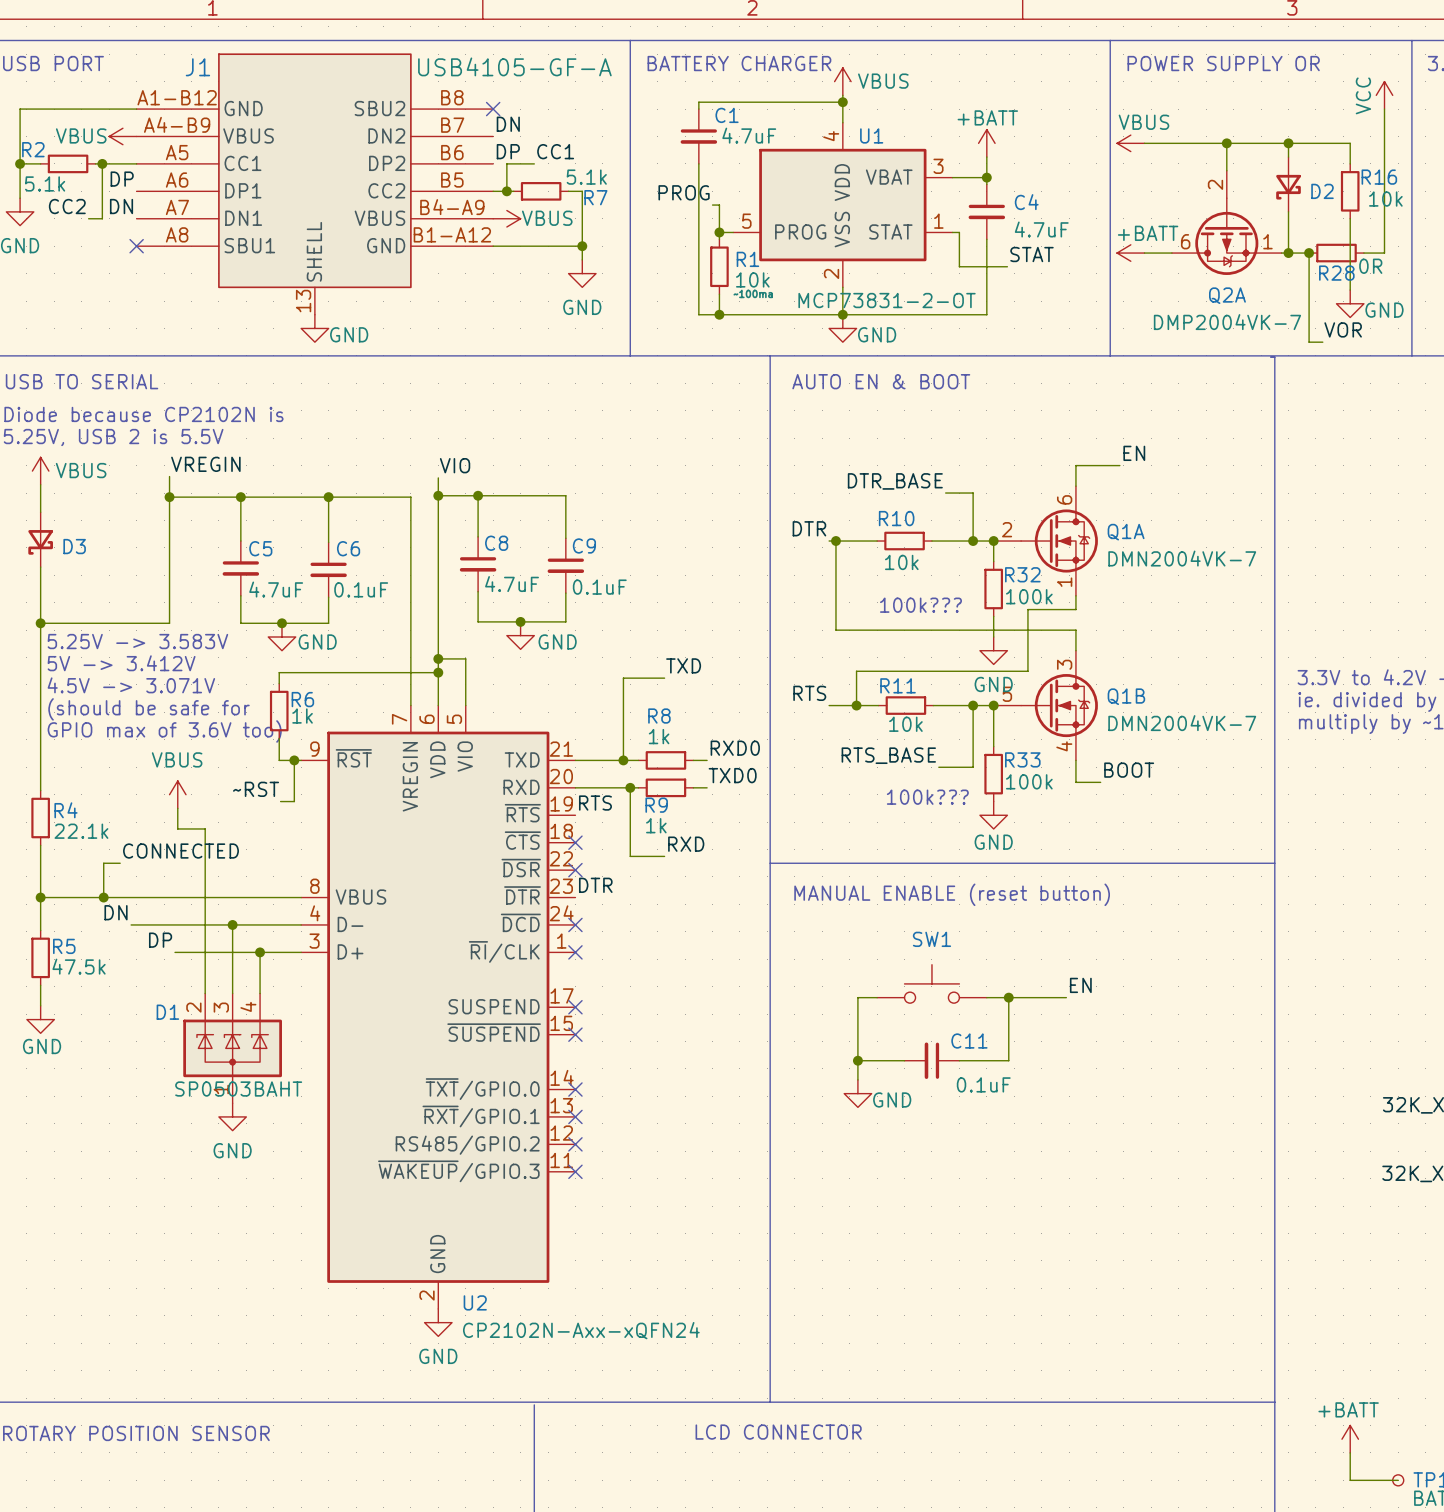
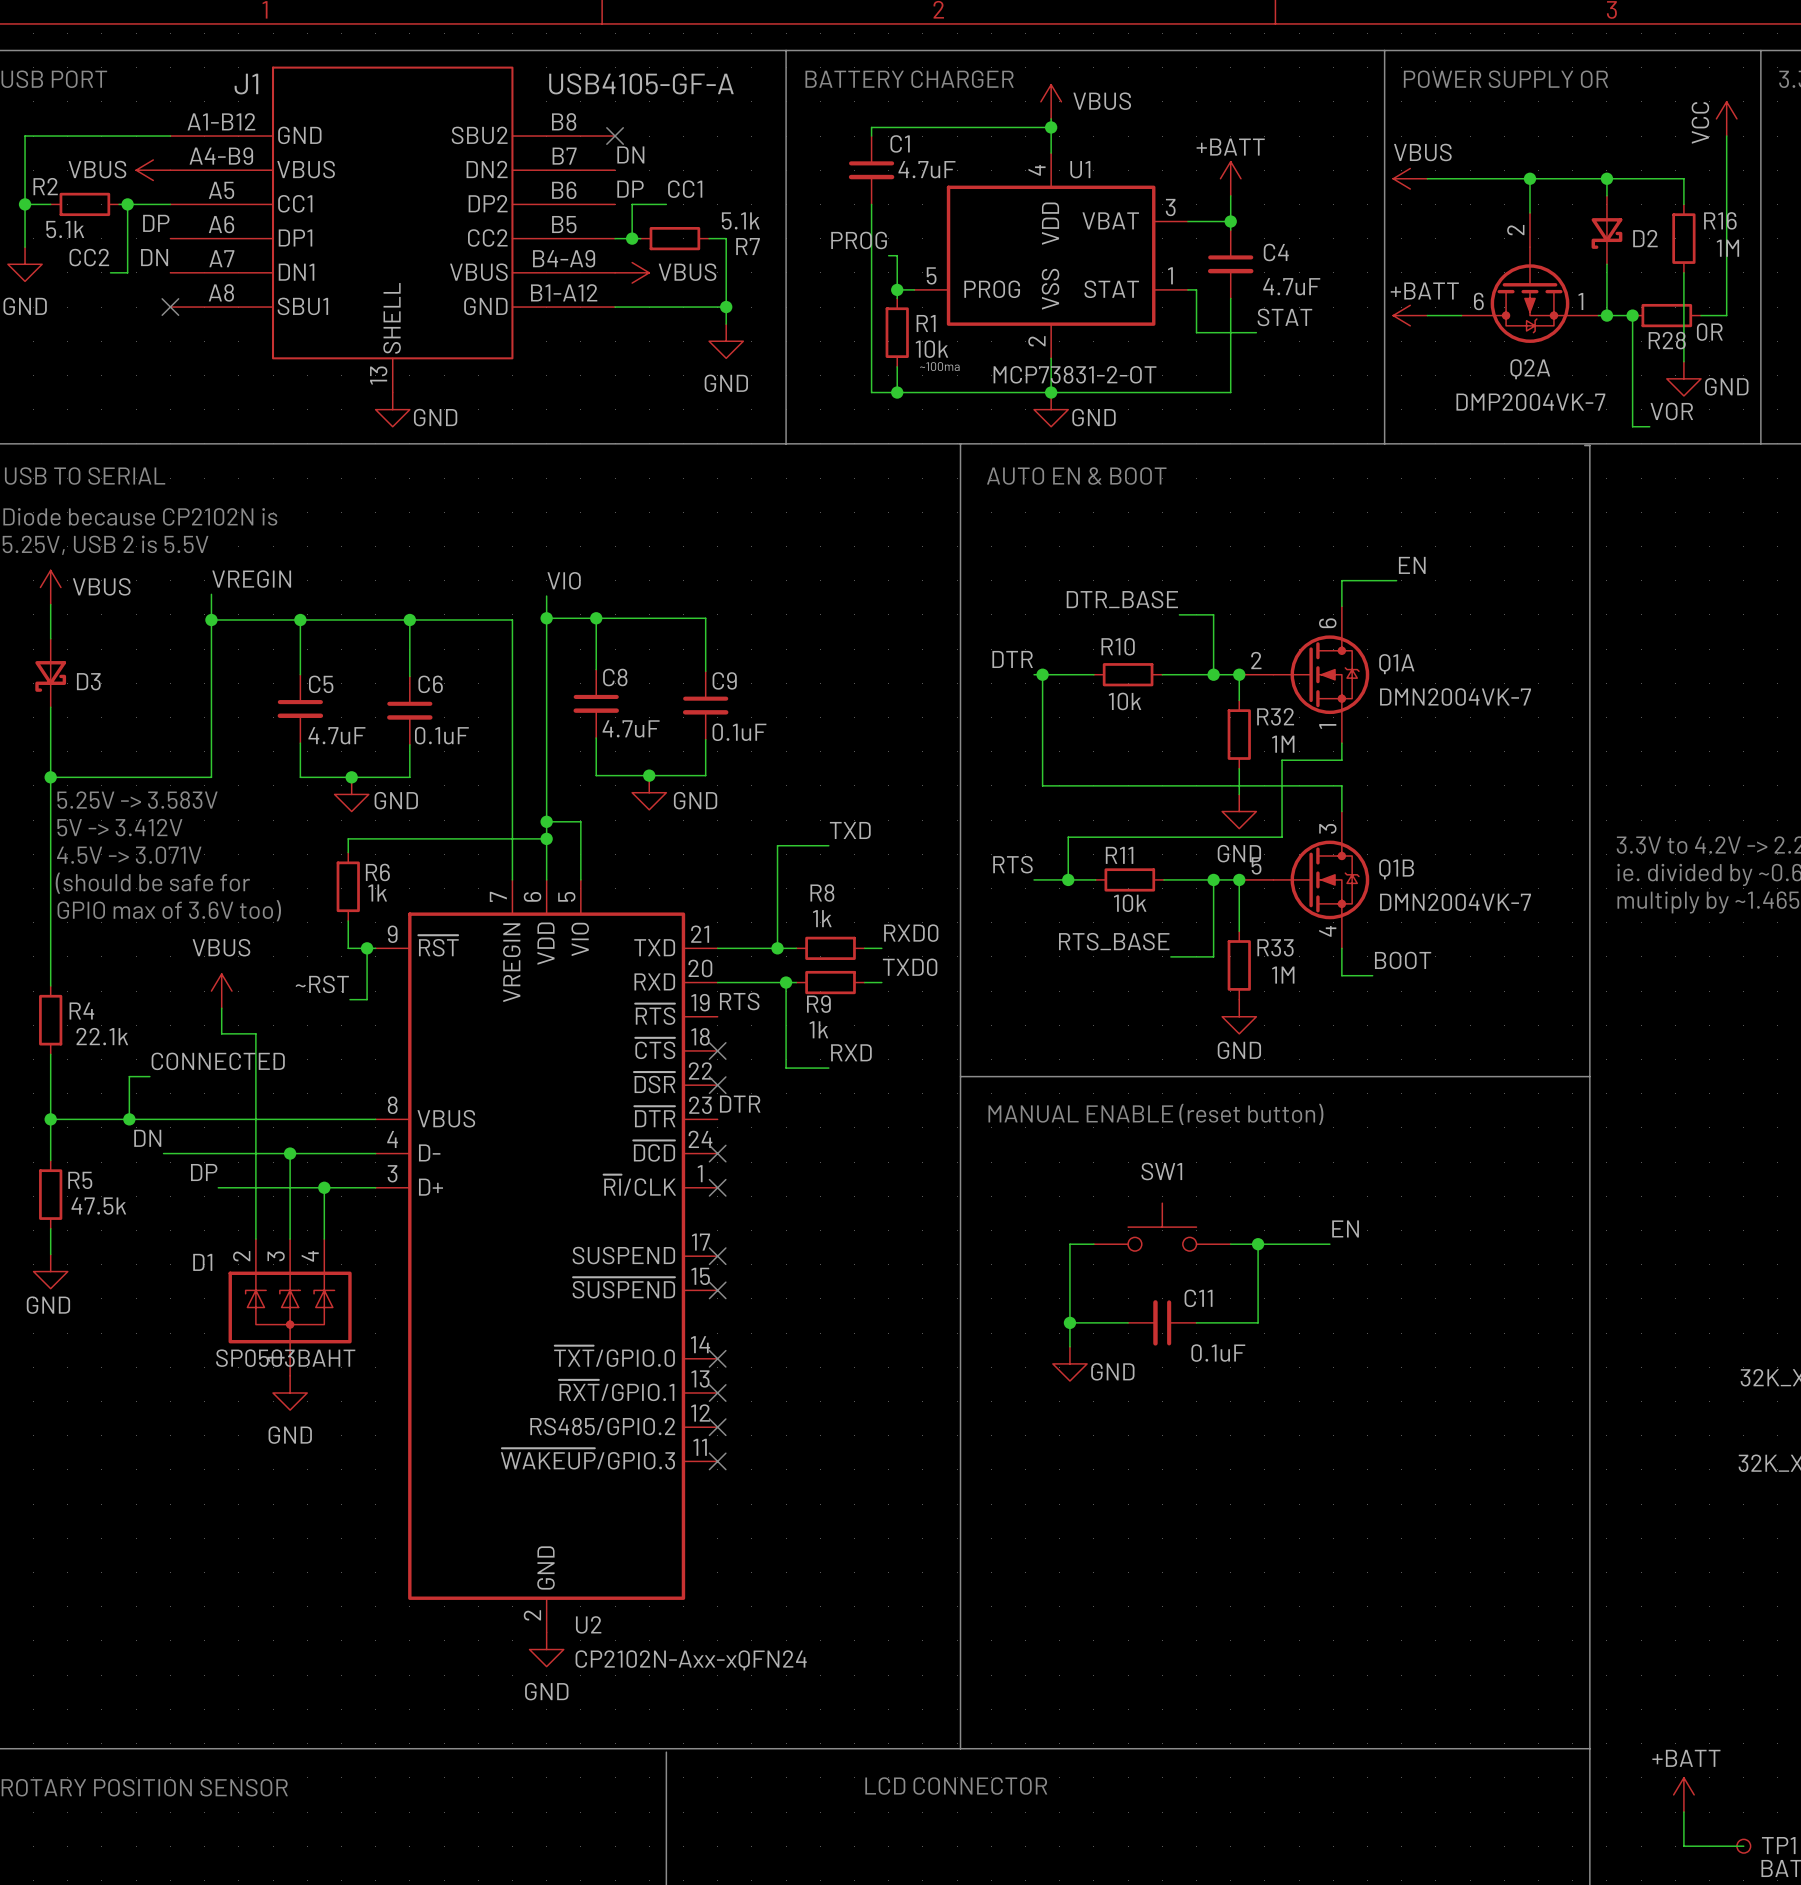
R16 value: 10k (1385, 199) -> 1M (1727, 248)
R32 value: 100k (1029, 596) -> 1M (1283, 744)
text: 100k??? (920, 605) -> none
R33 value: 100k (1029, 781) -> 1M (1283, 975)
text: 100k??? (927, 797) -> none

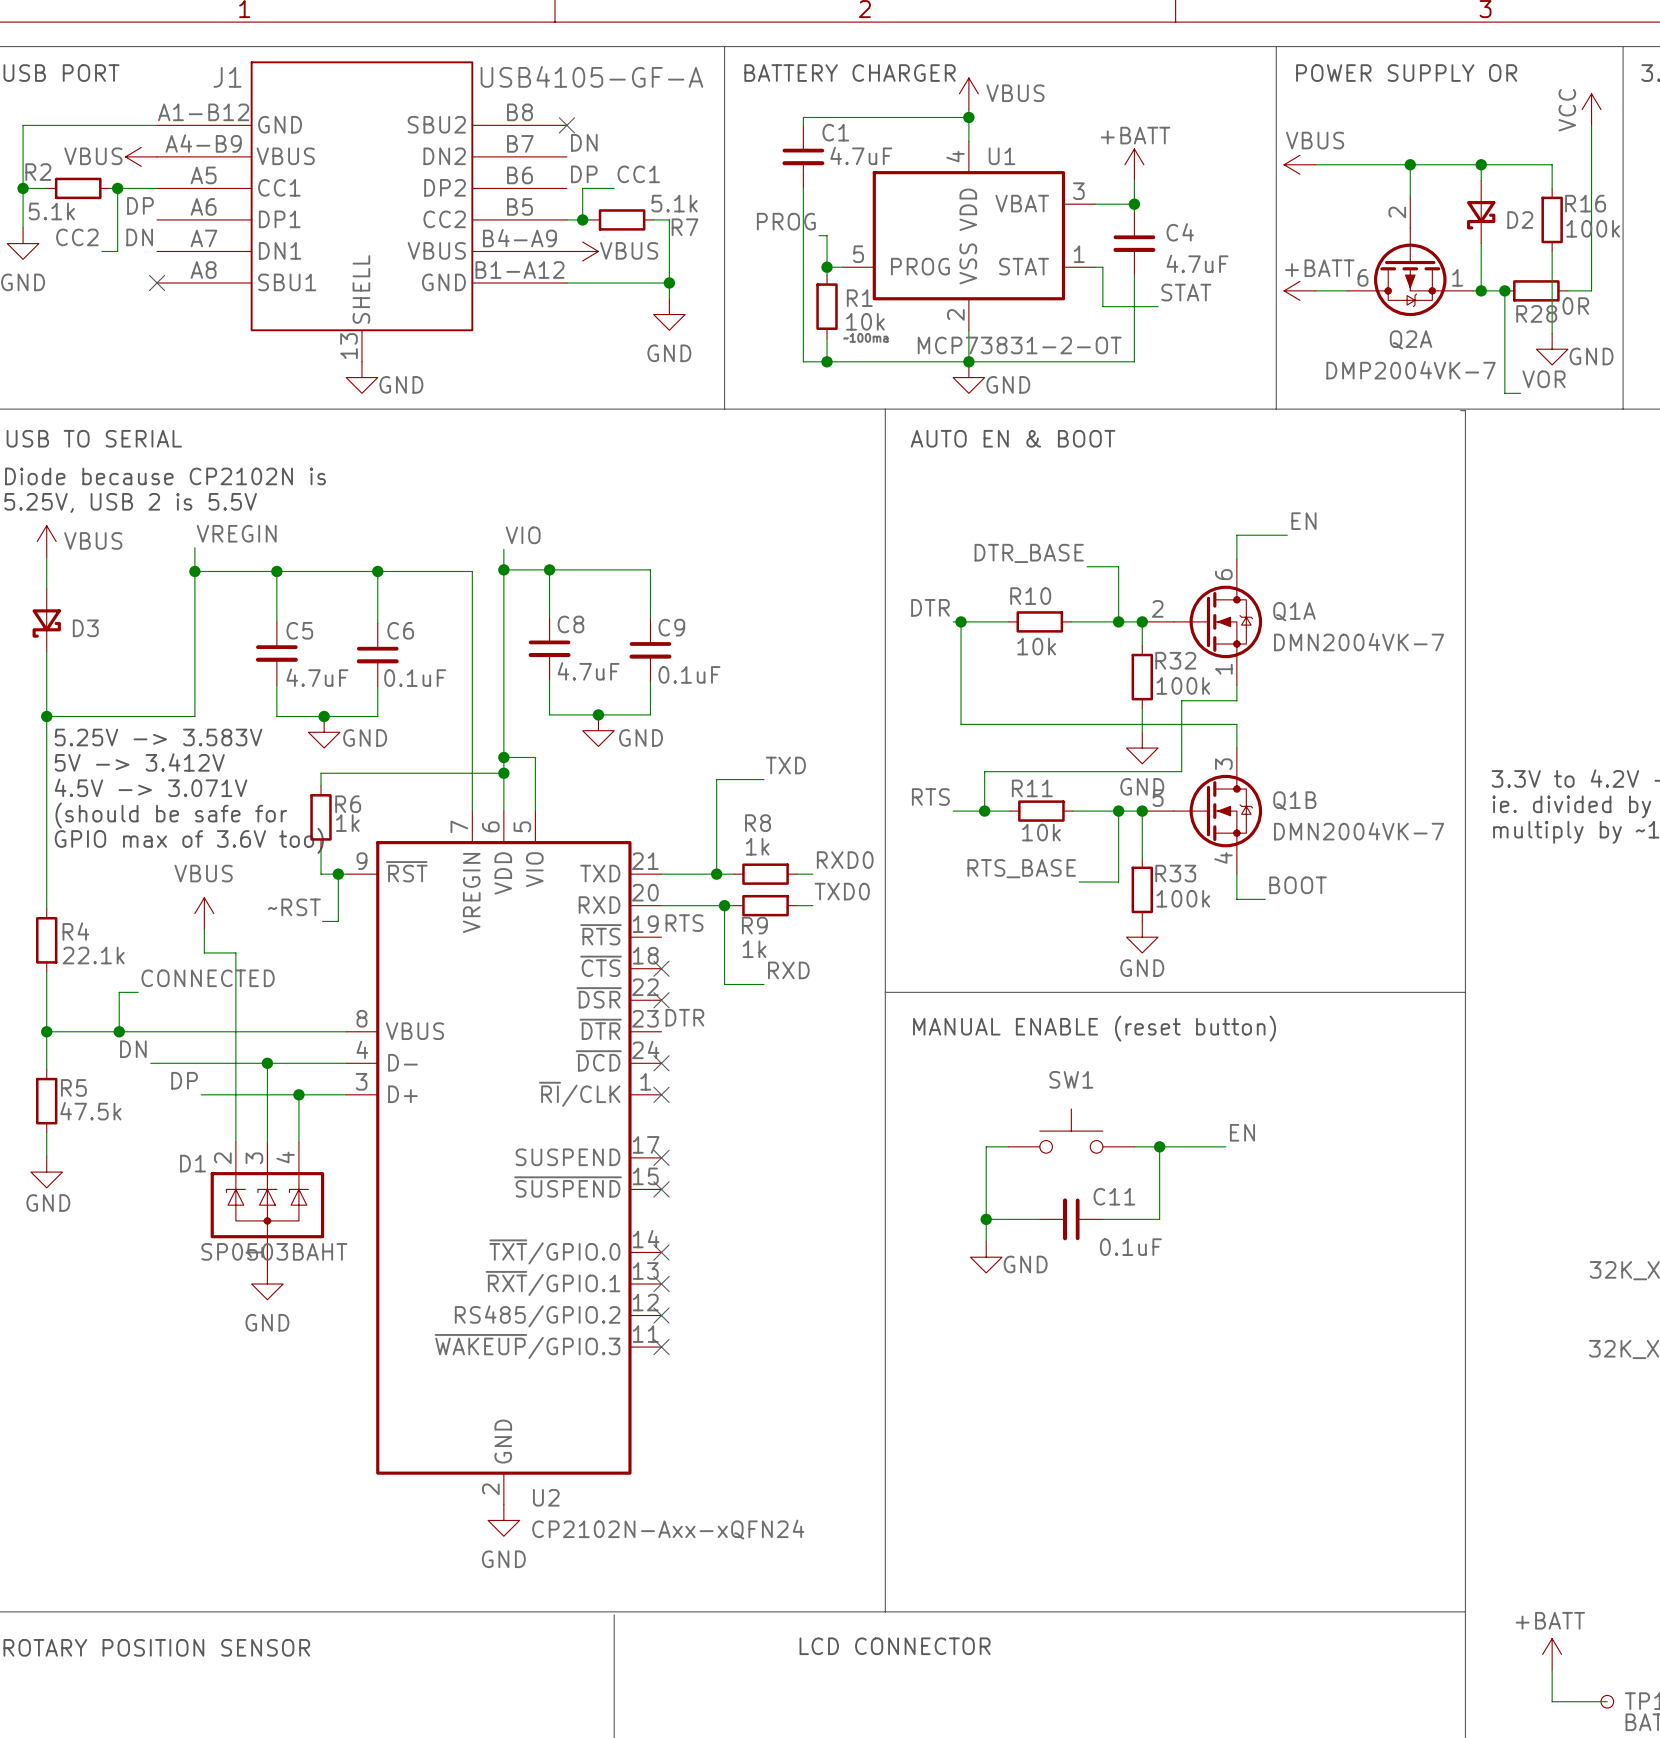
R16 value: 1M (1727, 248) -> 100k (1593, 228)
R32 value: 1M (1283, 744) -> 100k (1183, 685)
R33 value: 1M (1283, 975) -> 100k (1183, 898)

